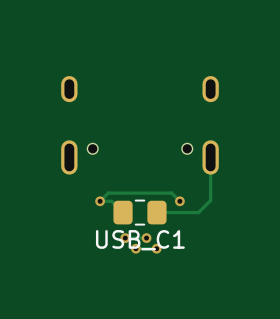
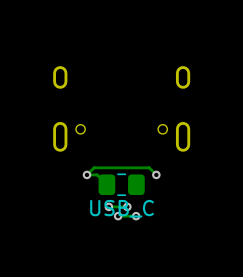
track: (210, 157) (210, 200) (198, 212) (156, 212) -> none
USB_C1 name: USB_C1 (140, 240) -> USB_C (122, 208)

